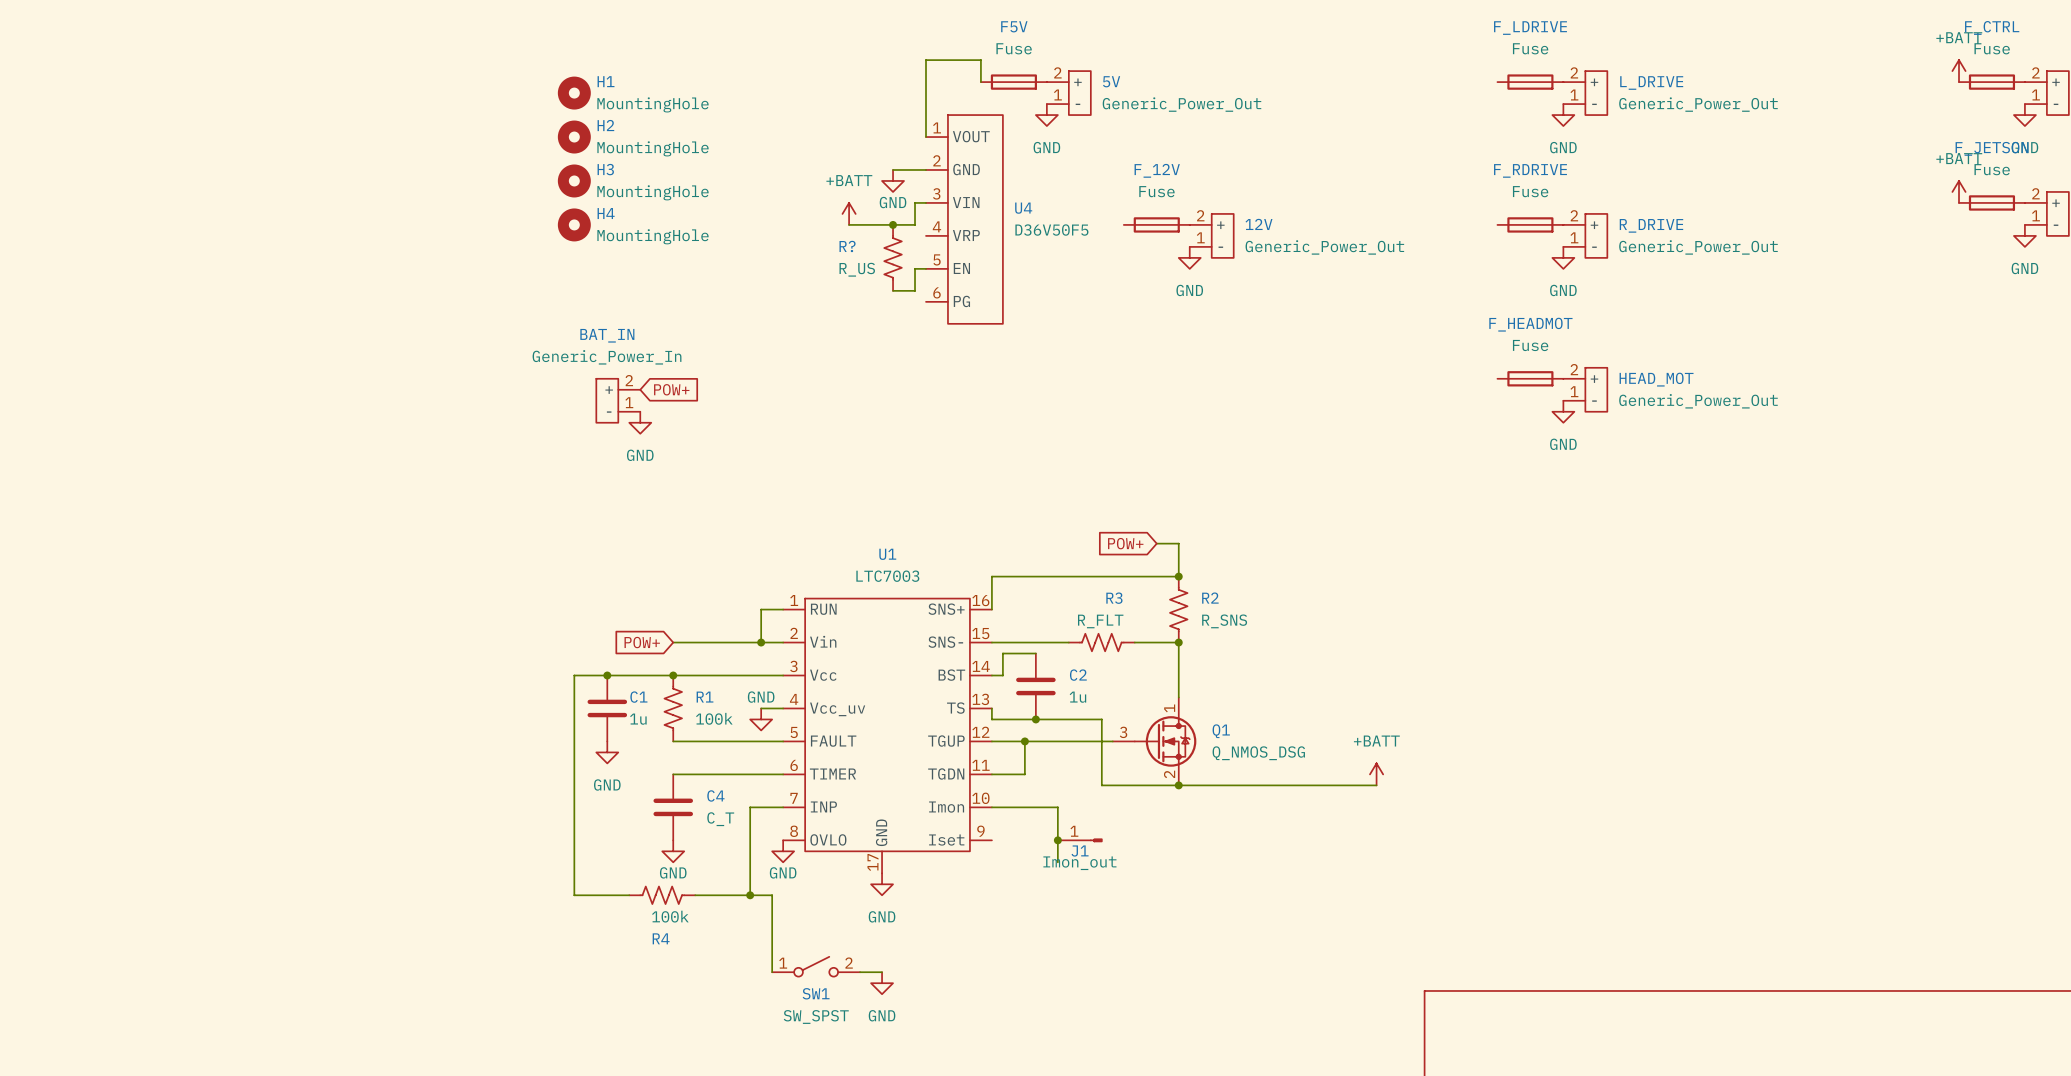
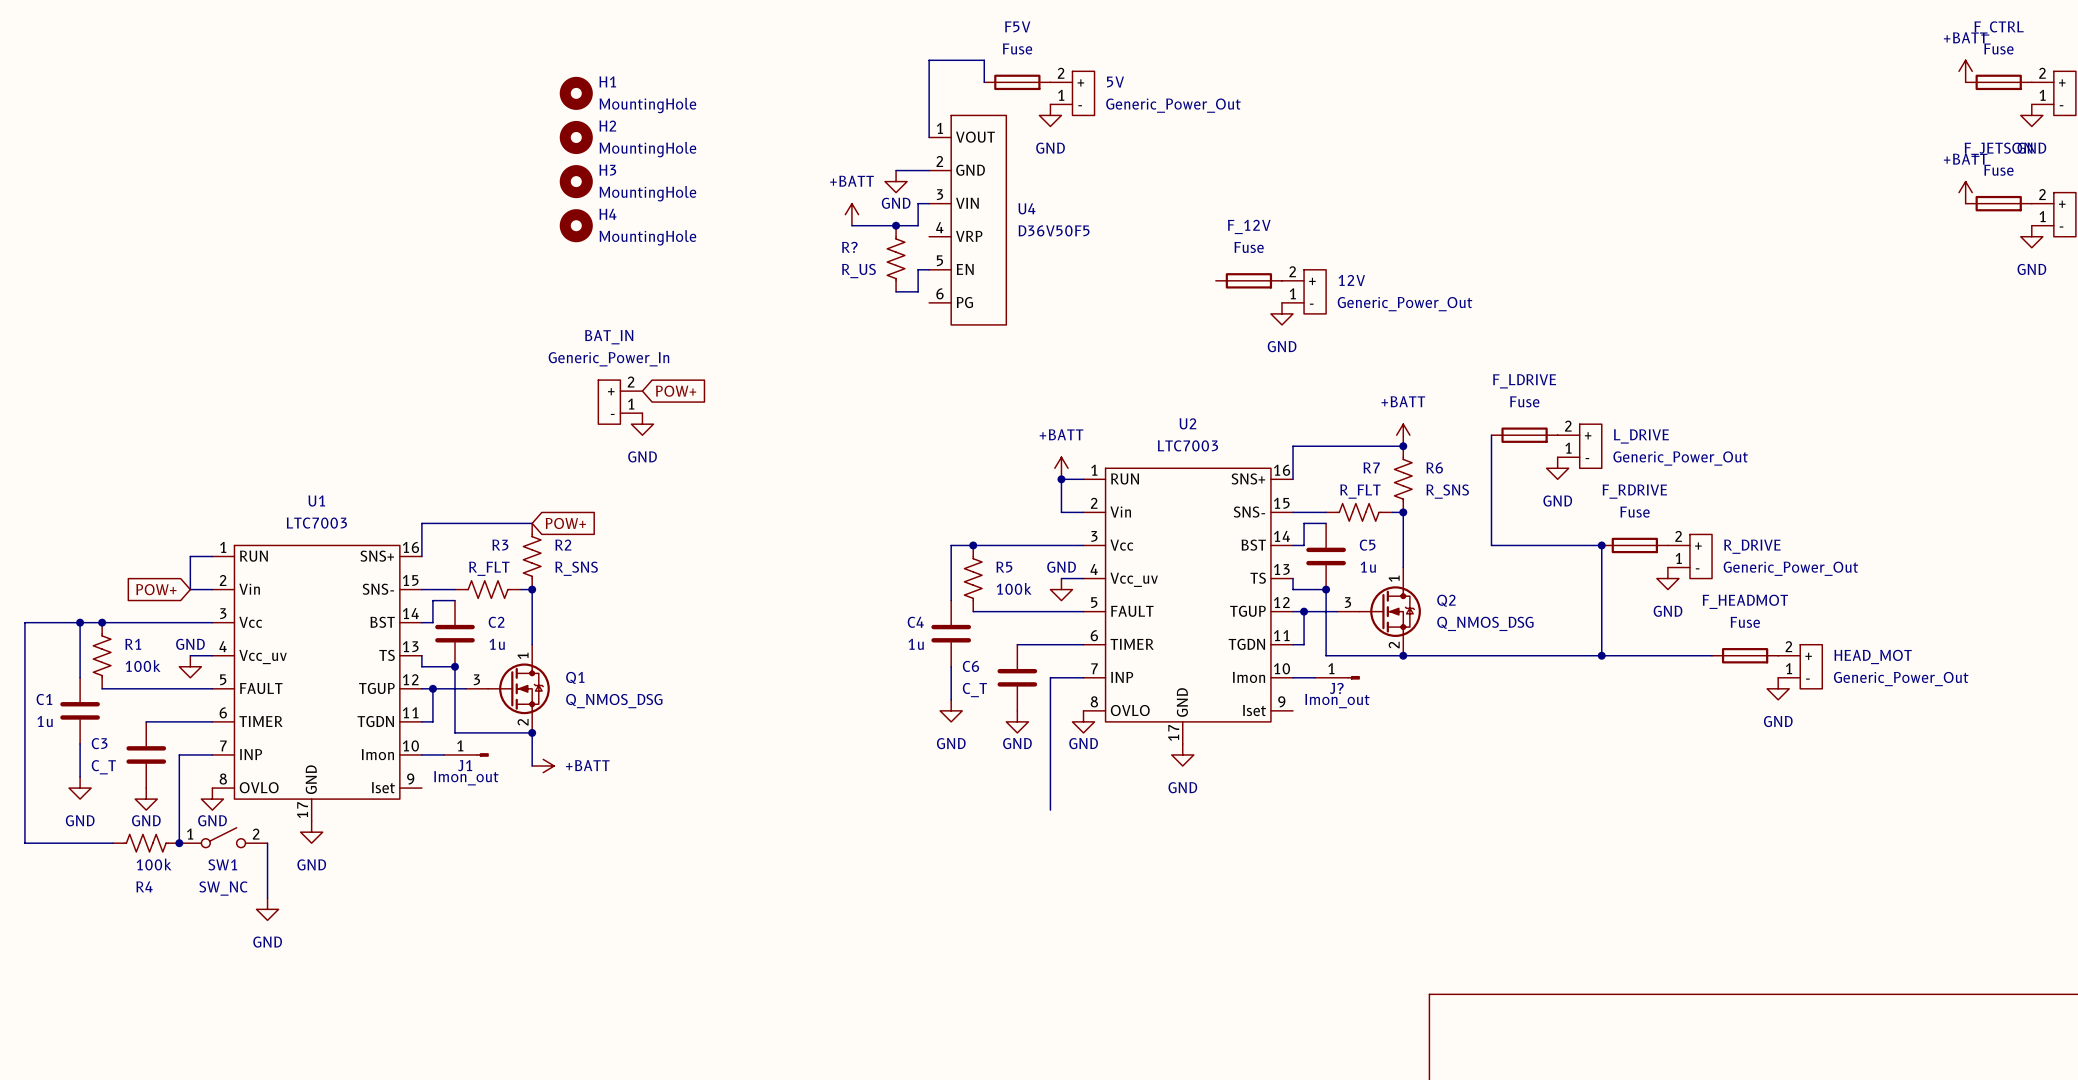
F_LDRIVE: Fuse (1530, 82) -> none
L_DRIVE: Generic_Power_Out (1585, 93) -> none
power symbol: GND (1563, 115) -> none
F_12V position: (1156, 224) -> (1248, 280)
F_RDRIVE: Fuse (1530, 224) -> none
12V position: (1211, 235) -> (1304, 291)
R_DRIVE: Generic_Power_Out (1585, 235) -> none
power symbol position: GND (1189, 257) -> GND (1281, 313)
power symbol: GND (1563, 257) -> none
F_HEADMOT: Fuse (1530, 378) -> none
HEAD_MOT: Generic_Power_Out (1585, 389) -> none
power symbol position: GND (1563, 411) -> GND (1557, 468)
power symbol: none -> +BATT (1403, 435)
wire: none -> (1491, 435) (1491, 545) (1601, 545) (1601, 655)
F_LDRIVE: none -> Fuse (1524, 435)
wire: none -> (1403, 446) (1293, 446) (1293, 479)
junction: none -> (1403, 446)
L_DRIVE: none -> Generic_Power_Out (1579, 446)
power symbol: none -> +BATT (1061, 468)
junction: none -> (1061, 479)
wire: none -> (1083, 479) (1061, 479) (1061, 512) (1083, 512)
R6: none -> R_SNS (1403, 479)
wire: none -> (1293, 512) (1326, 512)
R7: none -> R_FLT (1359, 512)
wire: none -> (1392, 512) (1403, 512) (1403, 567)
junction: none -> (1403, 512)
wire: none -> (532, 523) (421, 523) (421, 556)
wire: none -> (1326, 523) (1304, 523) (1304, 545) (1293, 545)
junction: none -> (973, 545)
wire: none -> (1083, 545) (951, 545) (951, 600)
global label: POW+ (1125, 543) -> none
wire: (1156, 543) (1178, 543) (1178, 576) (1079, 576) -> none
junction: none -> (1601, 545)
F_RDRIVE: none -> Fuse (1634, 545)
wire: none -> (212, 556) (190, 556) (190, 589) (212, 589)
C5: none -> 1u (1326, 556)
R_DRIVE: none -> Generic_Power_Out (1689, 556)
R5: none -> 100k (973, 578)
wire: (1057, 576) (991, 576) (991, 609) -> none
junction: (1178, 576) -> none
wire: none -> (1293, 578) (1293, 589) (1326, 589) (1326, 655) (1712, 655)
power symbol: none -> GND (1667, 578)
global label: none -> POW+ (156, 589)
wire: none -> (421, 589) (454, 589)
wire: none -> (521, 589) (532, 589) (532, 644)
junction: none -> (532, 589)
power symbol: none -> GND (1061, 589)
junction: none -> (1326, 589)
wire: none -> (454, 600) (432, 600) (432, 622) (421, 622)
U2: none -> LTC7003 (1188, 606)
wire: (783, 609) (761, 609) (761, 642) -> none
wire: none -> (973, 611) (1083, 611)
R2 position: (1178, 609) -> (532, 556)
wire: none -> (1293, 611) (1337, 611)
wire: none -> (1304, 611) (1304, 644) (1293, 644)
junction: none -> (1304, 611)
Q2: none -> Q_NMOS_DSG (1379, 611)
wire: none -> (80, 622) (80, 677)
junction: none -> (80, 622)
junction: none -> (102, 622)
wire: none -> (212, 622) (24, 622) (24, 843) (113, 843)
global label rotation: 0° (642, 642) -> 180° (565, 523)
global label position: POW+ (642, 642) -> POW+ (565, 523)
wire: (673, 642) (783, 642) -> none
junction: (761, 642) -> none
wire: (991, 642) (1013, 642) -> none
R3 position: (1101, 642) -> (488, 589)
wire: (1134, 642) (1178, 642) (1178, 697) -> none
junction: (1178, 642) -> none
wire: none -> (190, 655) (212, 655)
wire: none -> (421, 655) (421, 666) (454, 666) (454, 732) (532, 732) (532, 766)
wire: (1035, 653) (1002, 653) (1002, 675) (991, 675) -> none
junction: none -> (1403, 655)
junction: none -> (1601, 655)
F_HEADMOT: none -> Fuse (1745, 655)
power symbol: none -> GND (190, 666)
junction: none -> (454, 666)
wire: none -> (951, 666) (951, 699)
HEAD_MOT: none -> Generic_Power_Out (1800, 666)
junction: (607, 675) -> none
junction: (673, 675) -> none
wire: (783, 675) (574, 675) (574, 895) (629, 895) -> none
C6: none -> C_T (1017, 677)
wire: none -> (1083, 677) (1050, 677) (1050, 810)
wire: none -> (1293, 677) (1315, 677)
J?: none -> Imon_out (1337, 677)
wire: none -> (102, 688) (212, 688)
wire: none -> (421, 688) (466, 688)
wire: none -> (432, 688) (432, 721) (421, 721)
junction: none -> (432, 688)
C2 position: (1035, 686) -> (454, 633)
power symbol: none -> GND (1778, 688)
C1 name position: C1 (638, 697) -> C1 (44, 699)
C1 position: (607, 708) -> (80, 710)
R1 position: (673, 708) -> (102, 655)
wire: (761, 708) (783, 708) -> none
power symbol: none -> GND (951, 710)
wire: (991, 708) (991, 719) (1101, 719) (1101, 785) (1376, 785) -> none
wire: none -> (146, 721) (212, 721)
C1 value position: 1u (638, 719) -> 1u (45, 721)
power symbol: GND (761, 719) -> none
power symbol: none -> GND (1017, 721)
junction: (1035, 719) -> none
power symbol: none -> GND (1083, 721)
junction: none -> (532, 732)
U1 position: (887, 735) -> (317, 683)
wire: none -> (80, 743) (80, 777)
wire: (673, 741) (783, 741) -> none
wire: (991, 741) (1112, 741) -> none
wire: (1024, 741) (1024, 774) (991, 774) -> none
junction: (1024, 741) -> none
Q1 position: (1154, 741) -> (507, 688)
C3: none -> C_T (146, 754)
wire: none -> (212, 754) (179, 754) (179, 843)
wire: none -> (421, 754) (443, 754)
power symbol: GND (607, 752) -> none
power symbol: none -> GND (1182, 754)
power symbol: none -> +BATT (543, 766)
wire: (673, 774) (783, 774) -> none
power symbol: +BATT (1376, 774) -> none
power symbol: none -> GND (80, 788)
junction: (1178, 785) -> none
C4 name position: C4 (715, 795) -> C4 (915, 622)
power symbol: none -> GND (146, 799)
power symbol: none -> GND (212, 799)
C4 position: (673, 807) -> (951, 633)
wire: (783, 807) (750, 807) (750, 895) -> none
wire: (991, 807) (1057, 807) (1057, 862) -> none
C4 value: C_T (720, 819) -> 1u (916, 644)
power symbol: none -> GND (311, 832)
junction: none -> (179, 843)
wire: none -> (267, 843) (267, 898)
junction: (1057, 840) -> none
J1 position: (1080, 840) -> (466, 754)
power symbol: GND (673, 851) -> none
power symbol: GND (783, 851) -> none
power symbol: GND (882, 884) -> none
R4 position: (662, 895) -> (146, 843)
wire: (695, 895) (772, 895) (772, 972) -> none
junction: (750, 895) -> none
power symbol: none -> GND (267, 909)
SW1 position: (816, 966) -> (223, 837)
wire: (860, 972) (882, 972) -> none
power symbol: GND (882, 983) -> none
SW1 value: SW_SPST (816, 1017) -> SW_NC (223, 888)

